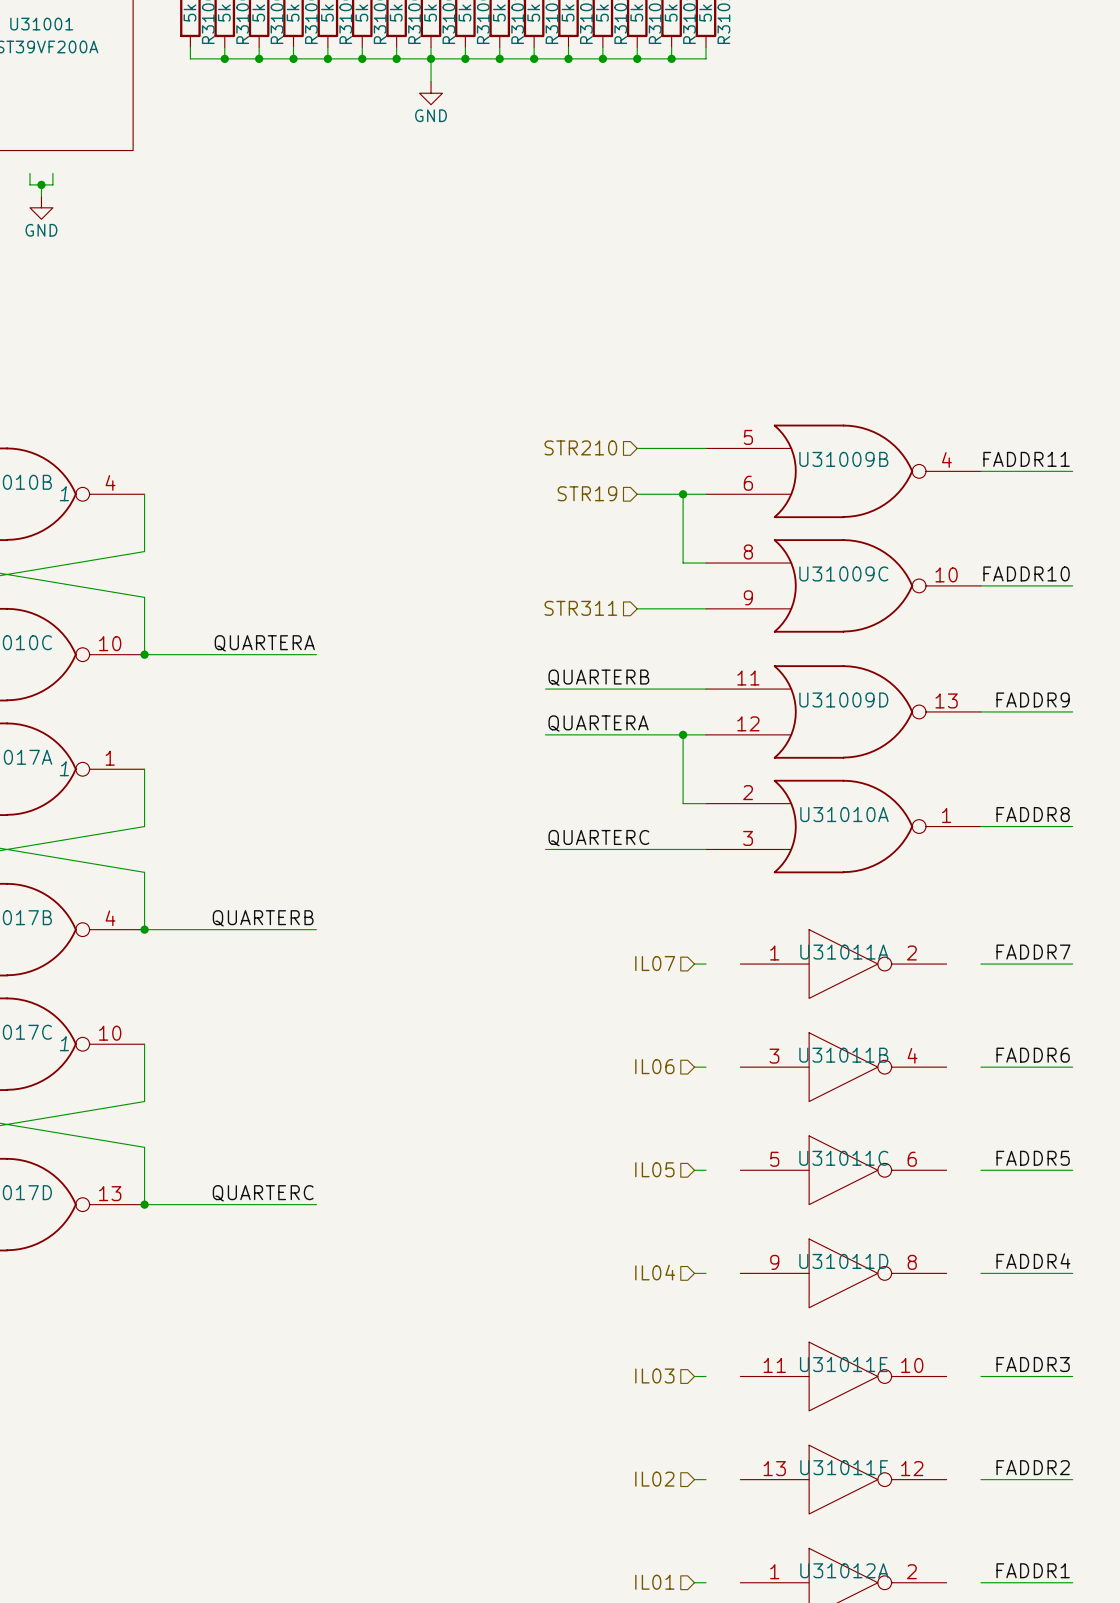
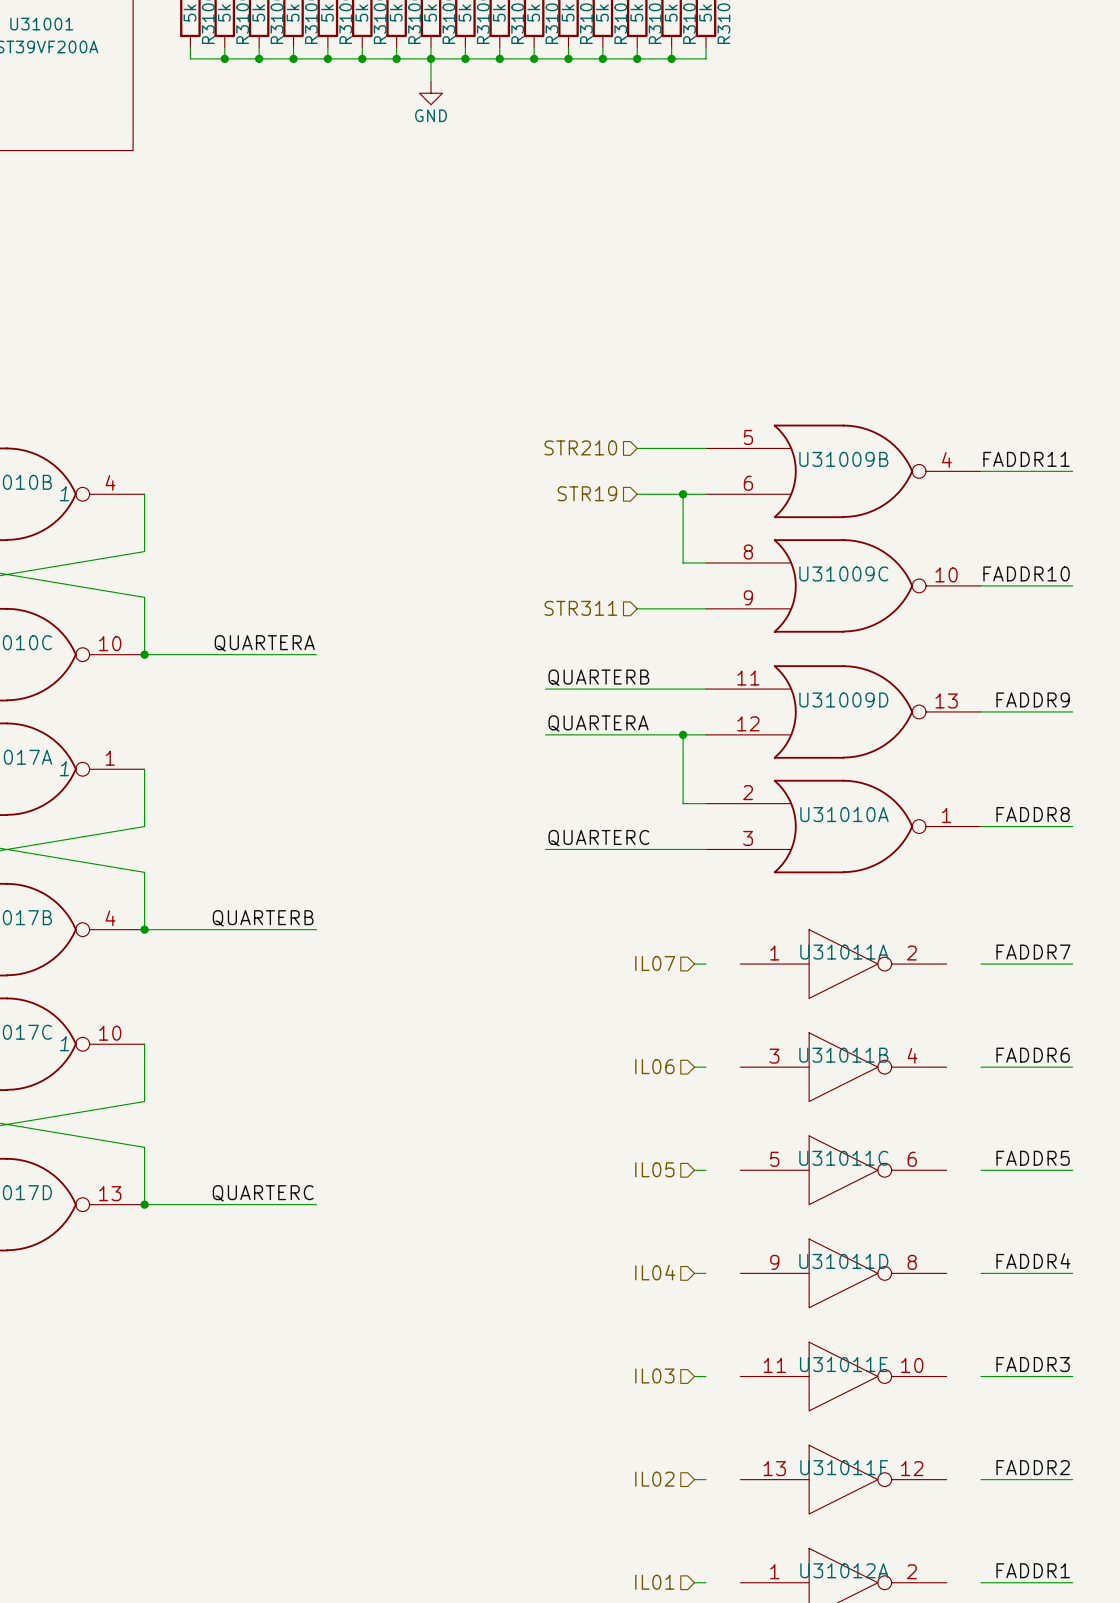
wire: (29, 173) (29, 184) (52, 184) (52, 173) -> none
wire: (41, 184) (41, 196) -> none
junction: (41, 184) -> none
power symbol: GND (41, 207) -> none

